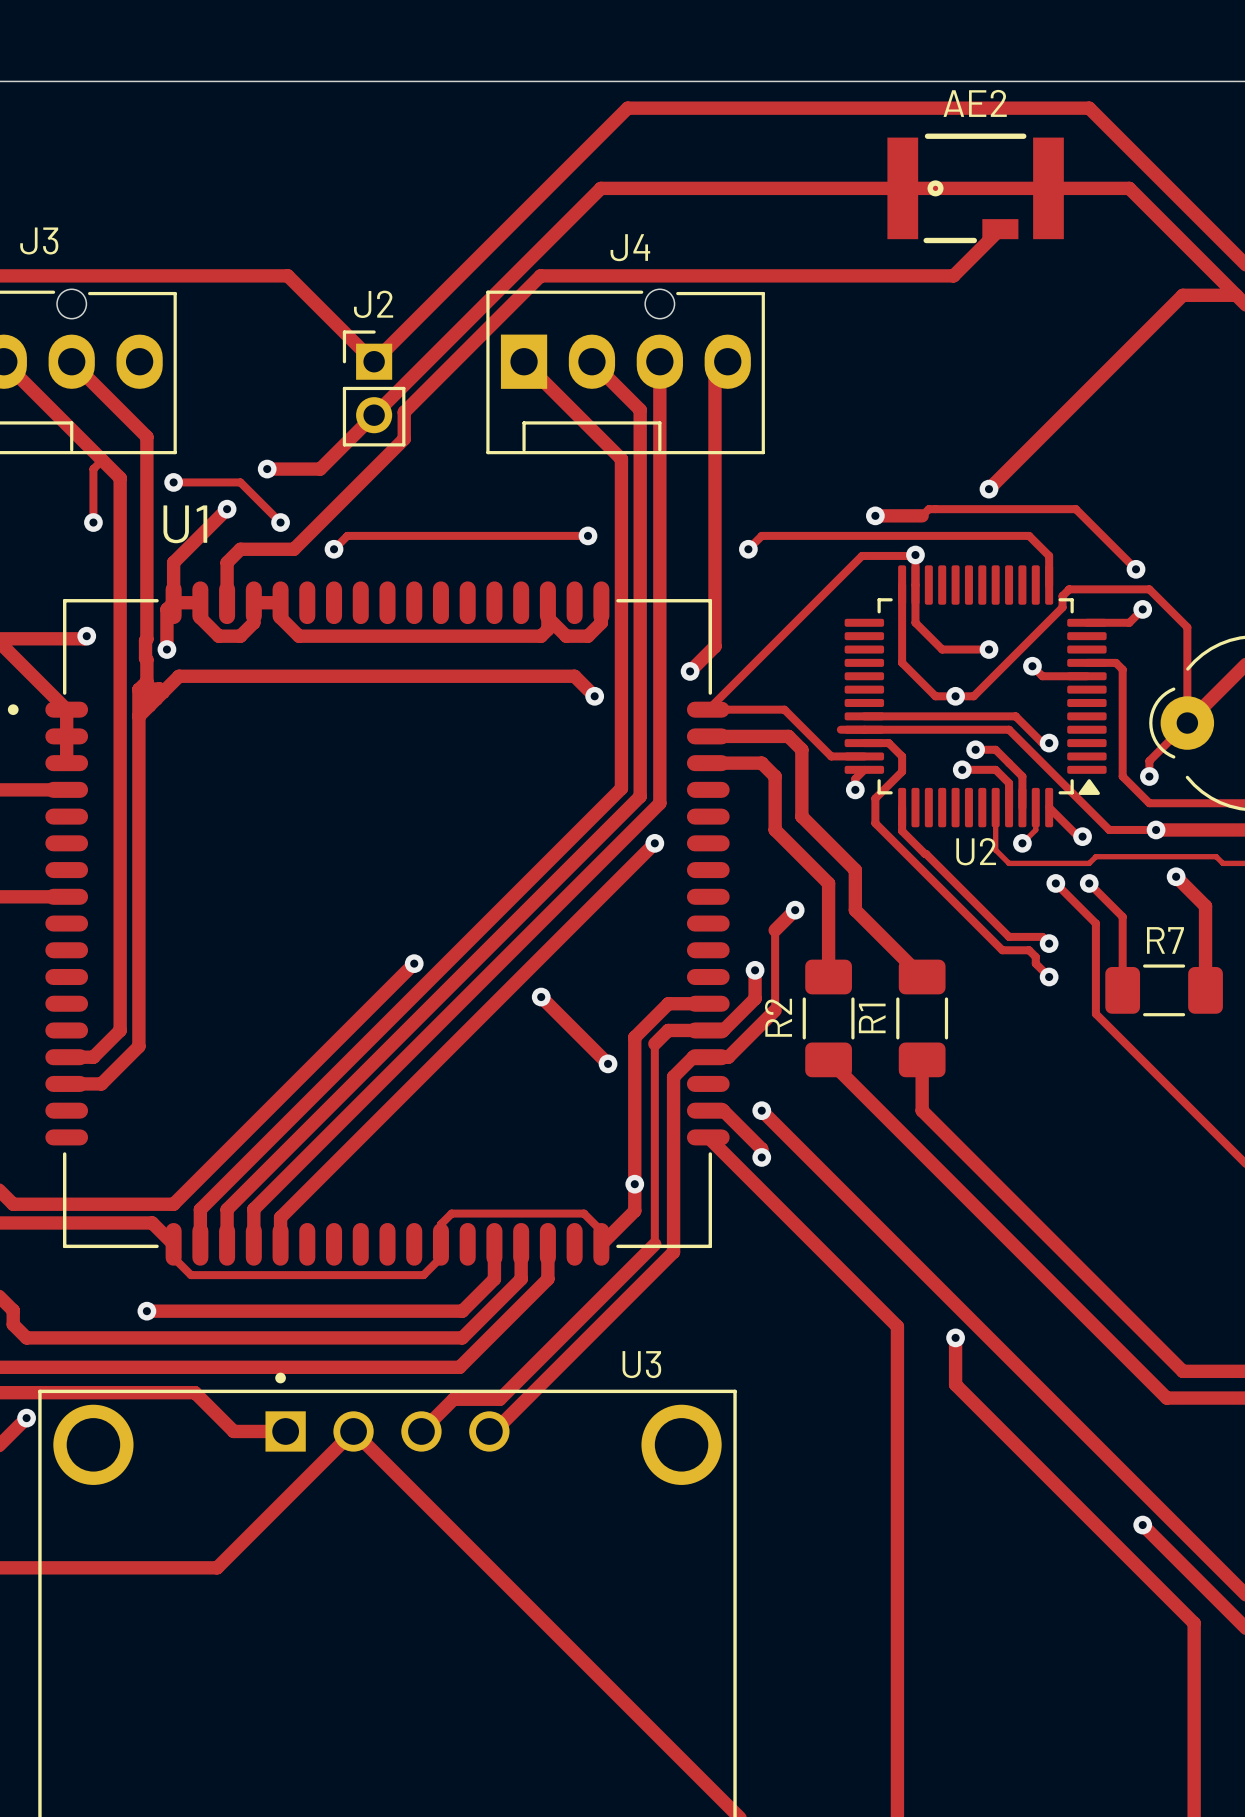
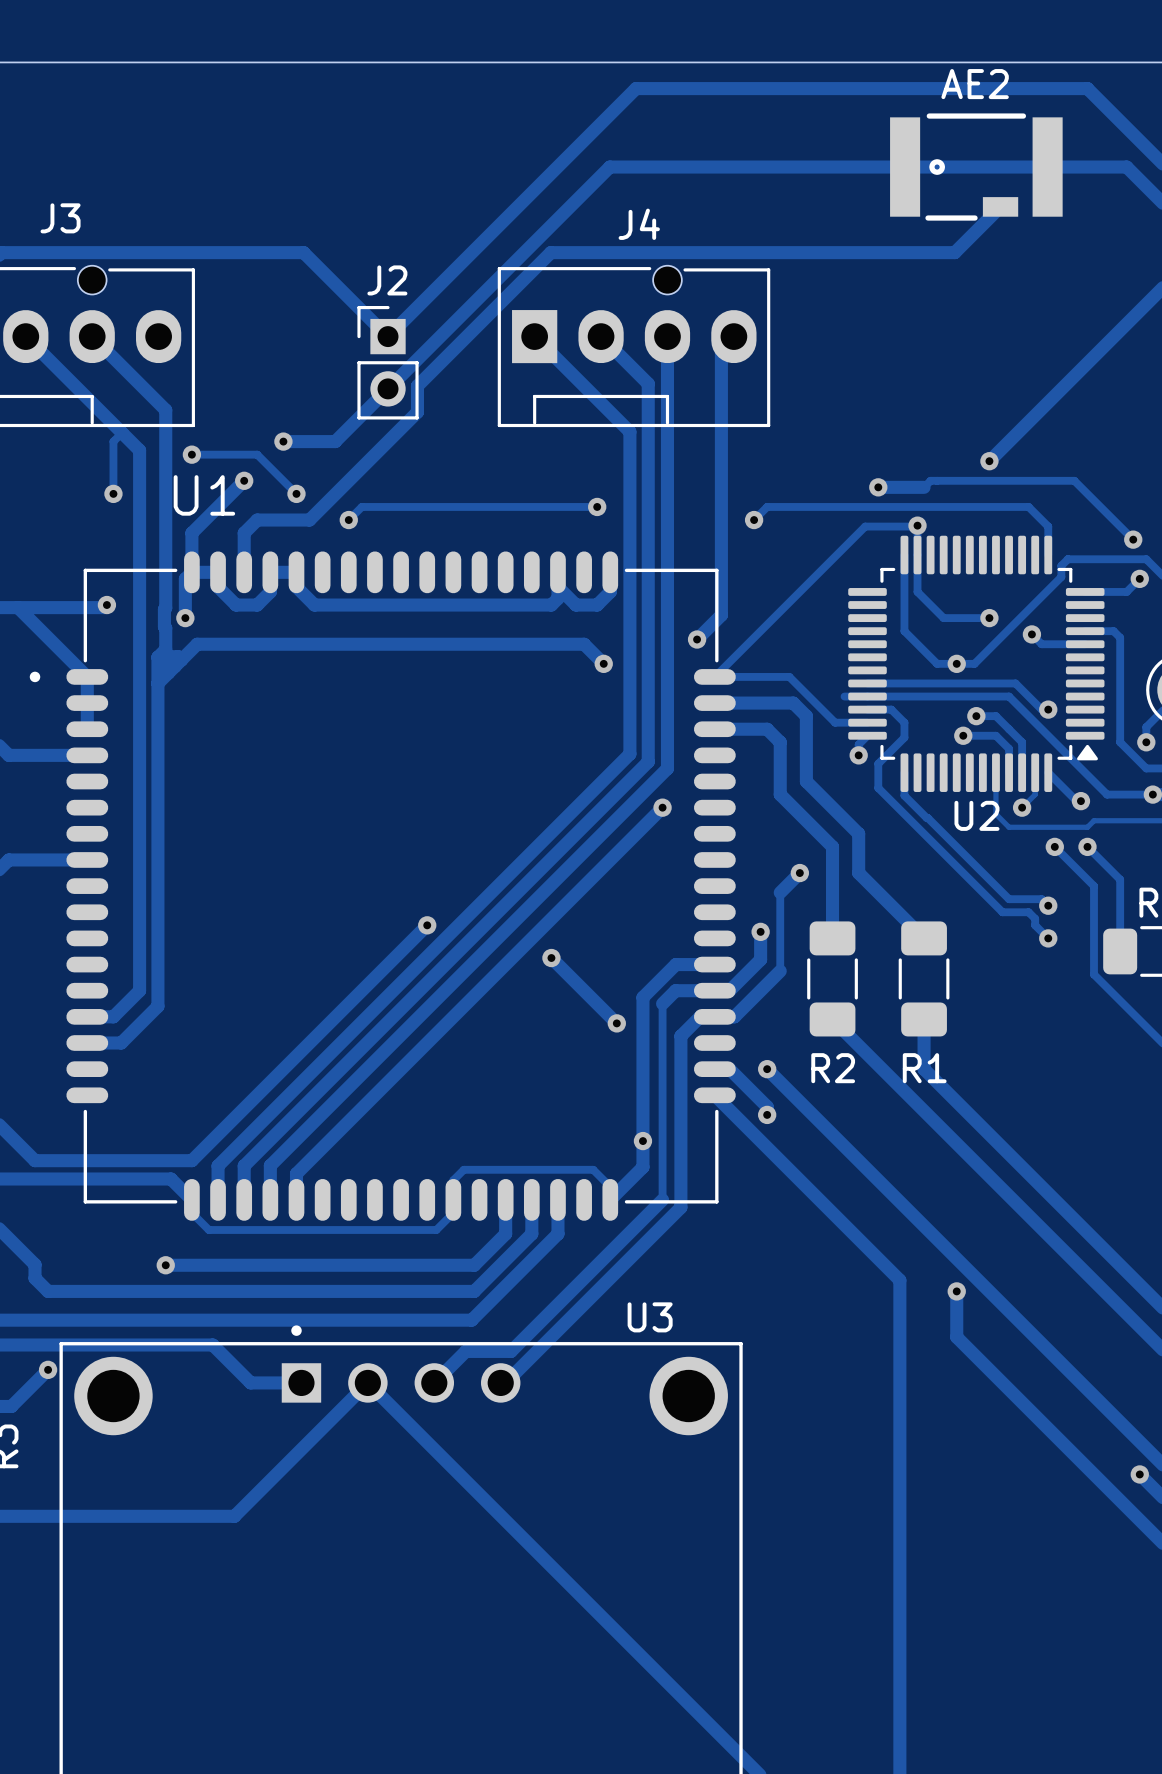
R2 name rotation: 0° (778, 1017) -> 90° clockwise (833, 1068)
R2 name position: R2 (778, 1017) -> R2 (833, 1068)
R1 name rotation: 0° (872, 1018) -> 90° clockwise (924, 1068)
R1 name position: R1 (872, 1018) -> R1 (924, 1068)

